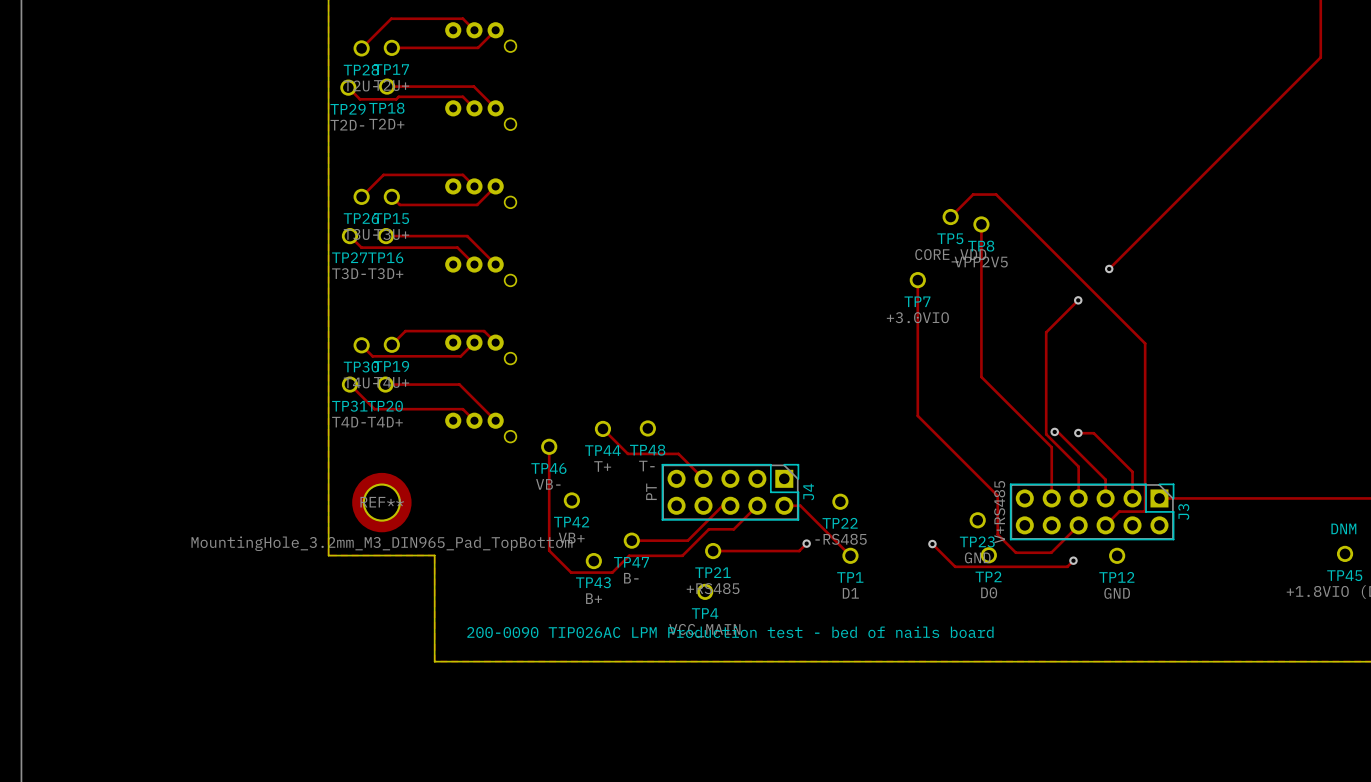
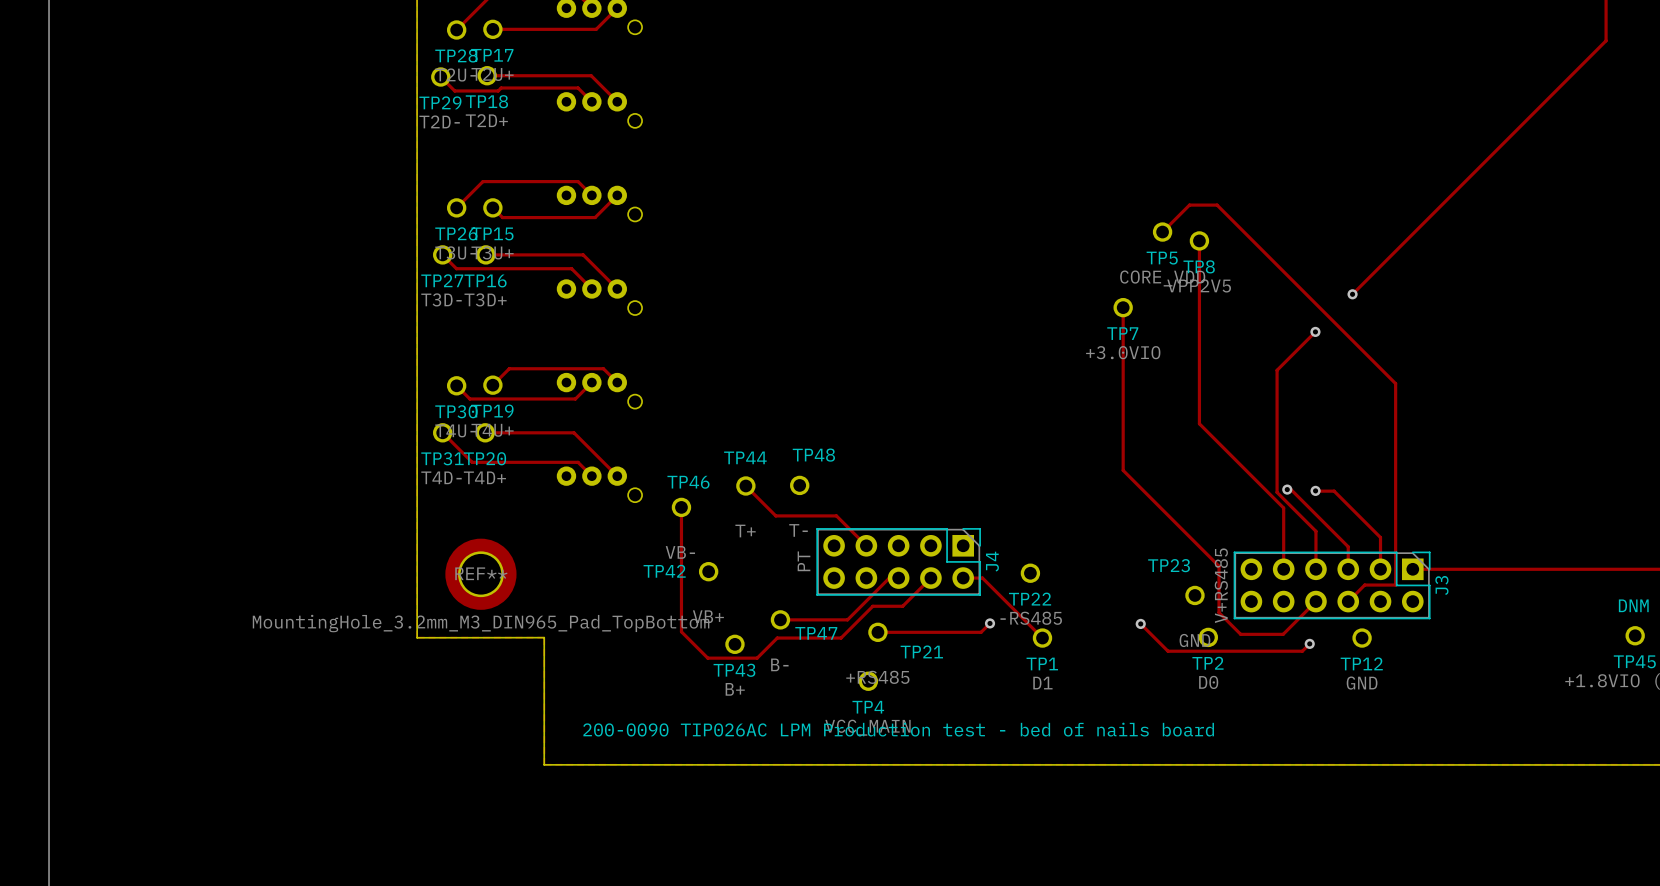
TP44 name position: TP44 (602, 450) -> TP44 (745, 457)
TP48 name position: TP48 (647, 450) -> TP48 (813, 455)
TP46 name position: TP46 (548, 468) -> TP46 (688, 482)
TP42 name position: TP42 (571, 522) -> TP42 (664, 571)
TP23 name position: TP23 (977, 541) -> TP23 (1169, 565)
TP47 name position: TP47 (631, 562) -> TP47 (816, 633)
TP21 name position: TP21 (712, 572) -> TP21 (921, 651)

